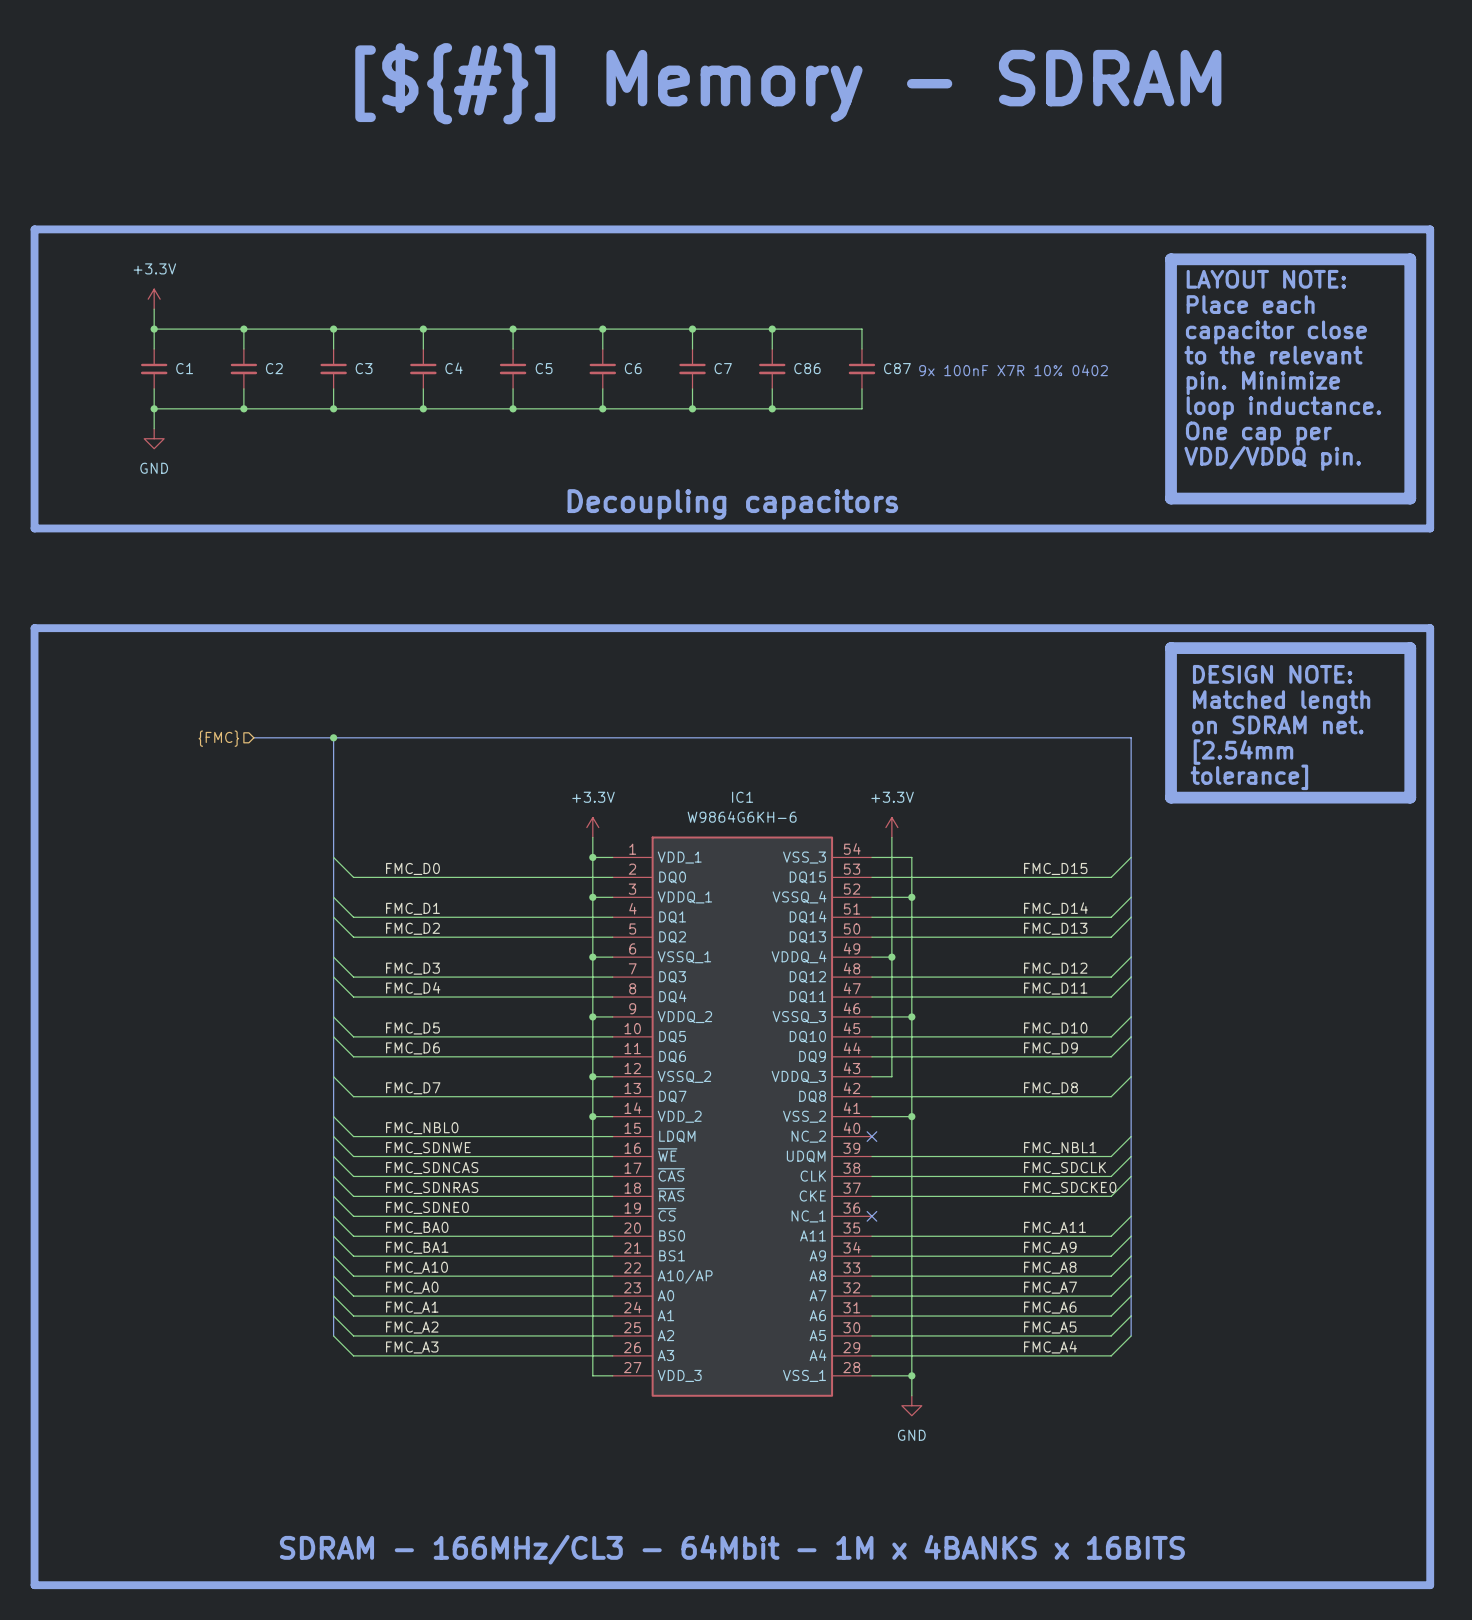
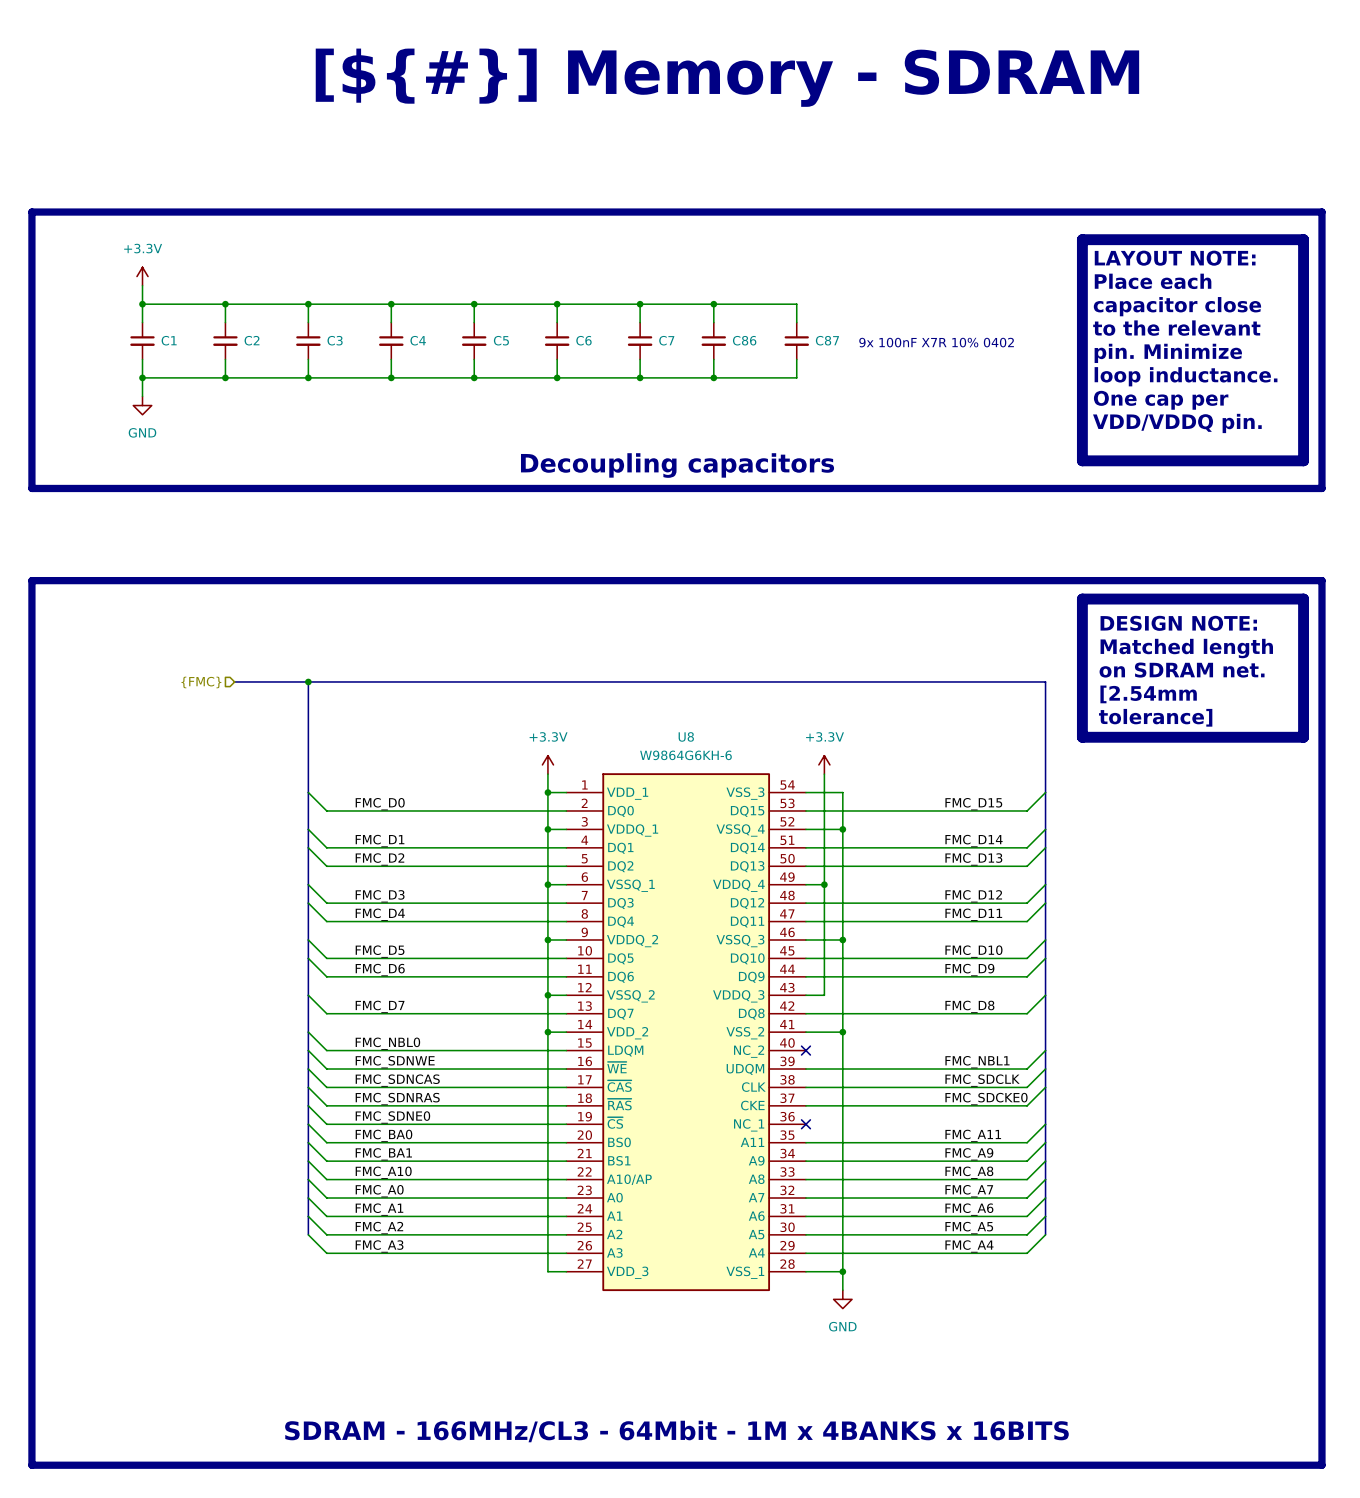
IC1 name: IC1 (742, 797) -> U8 (686, 736)

